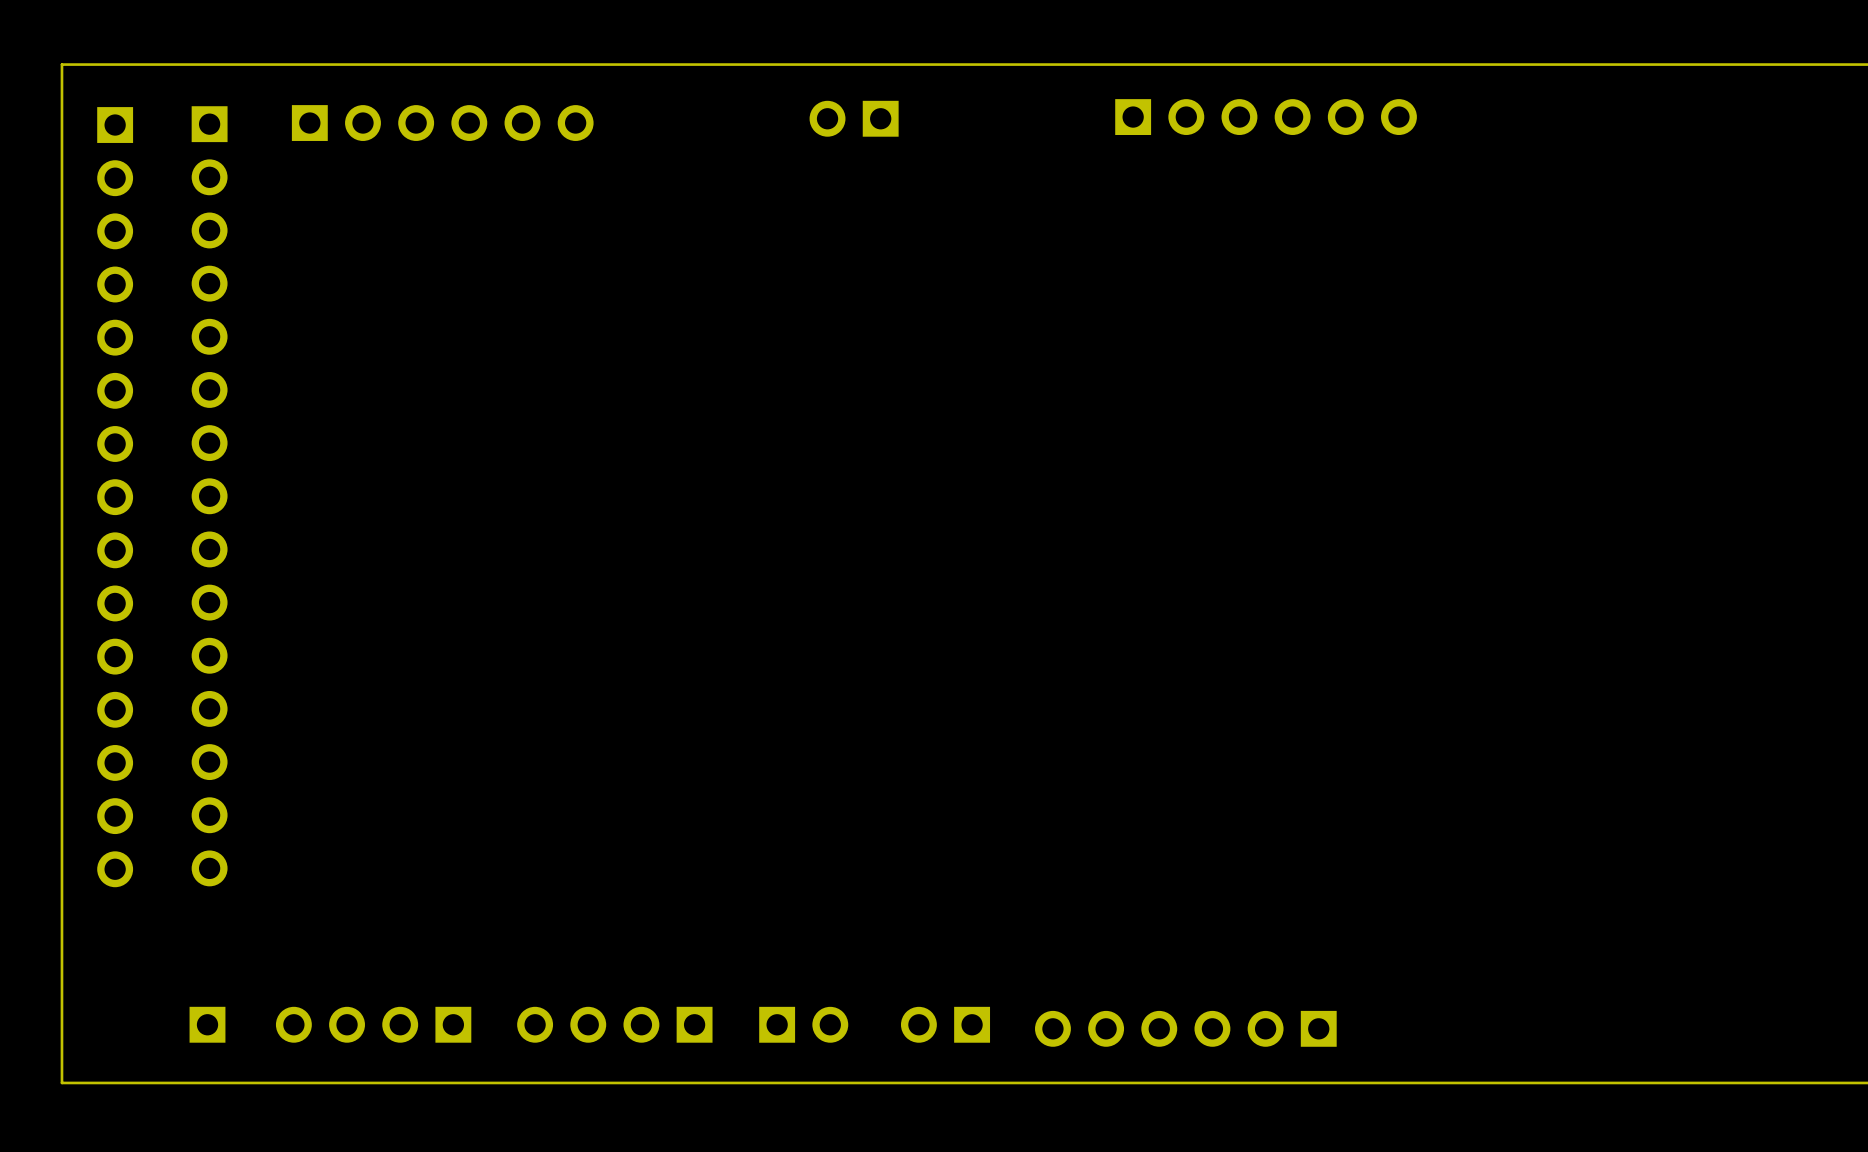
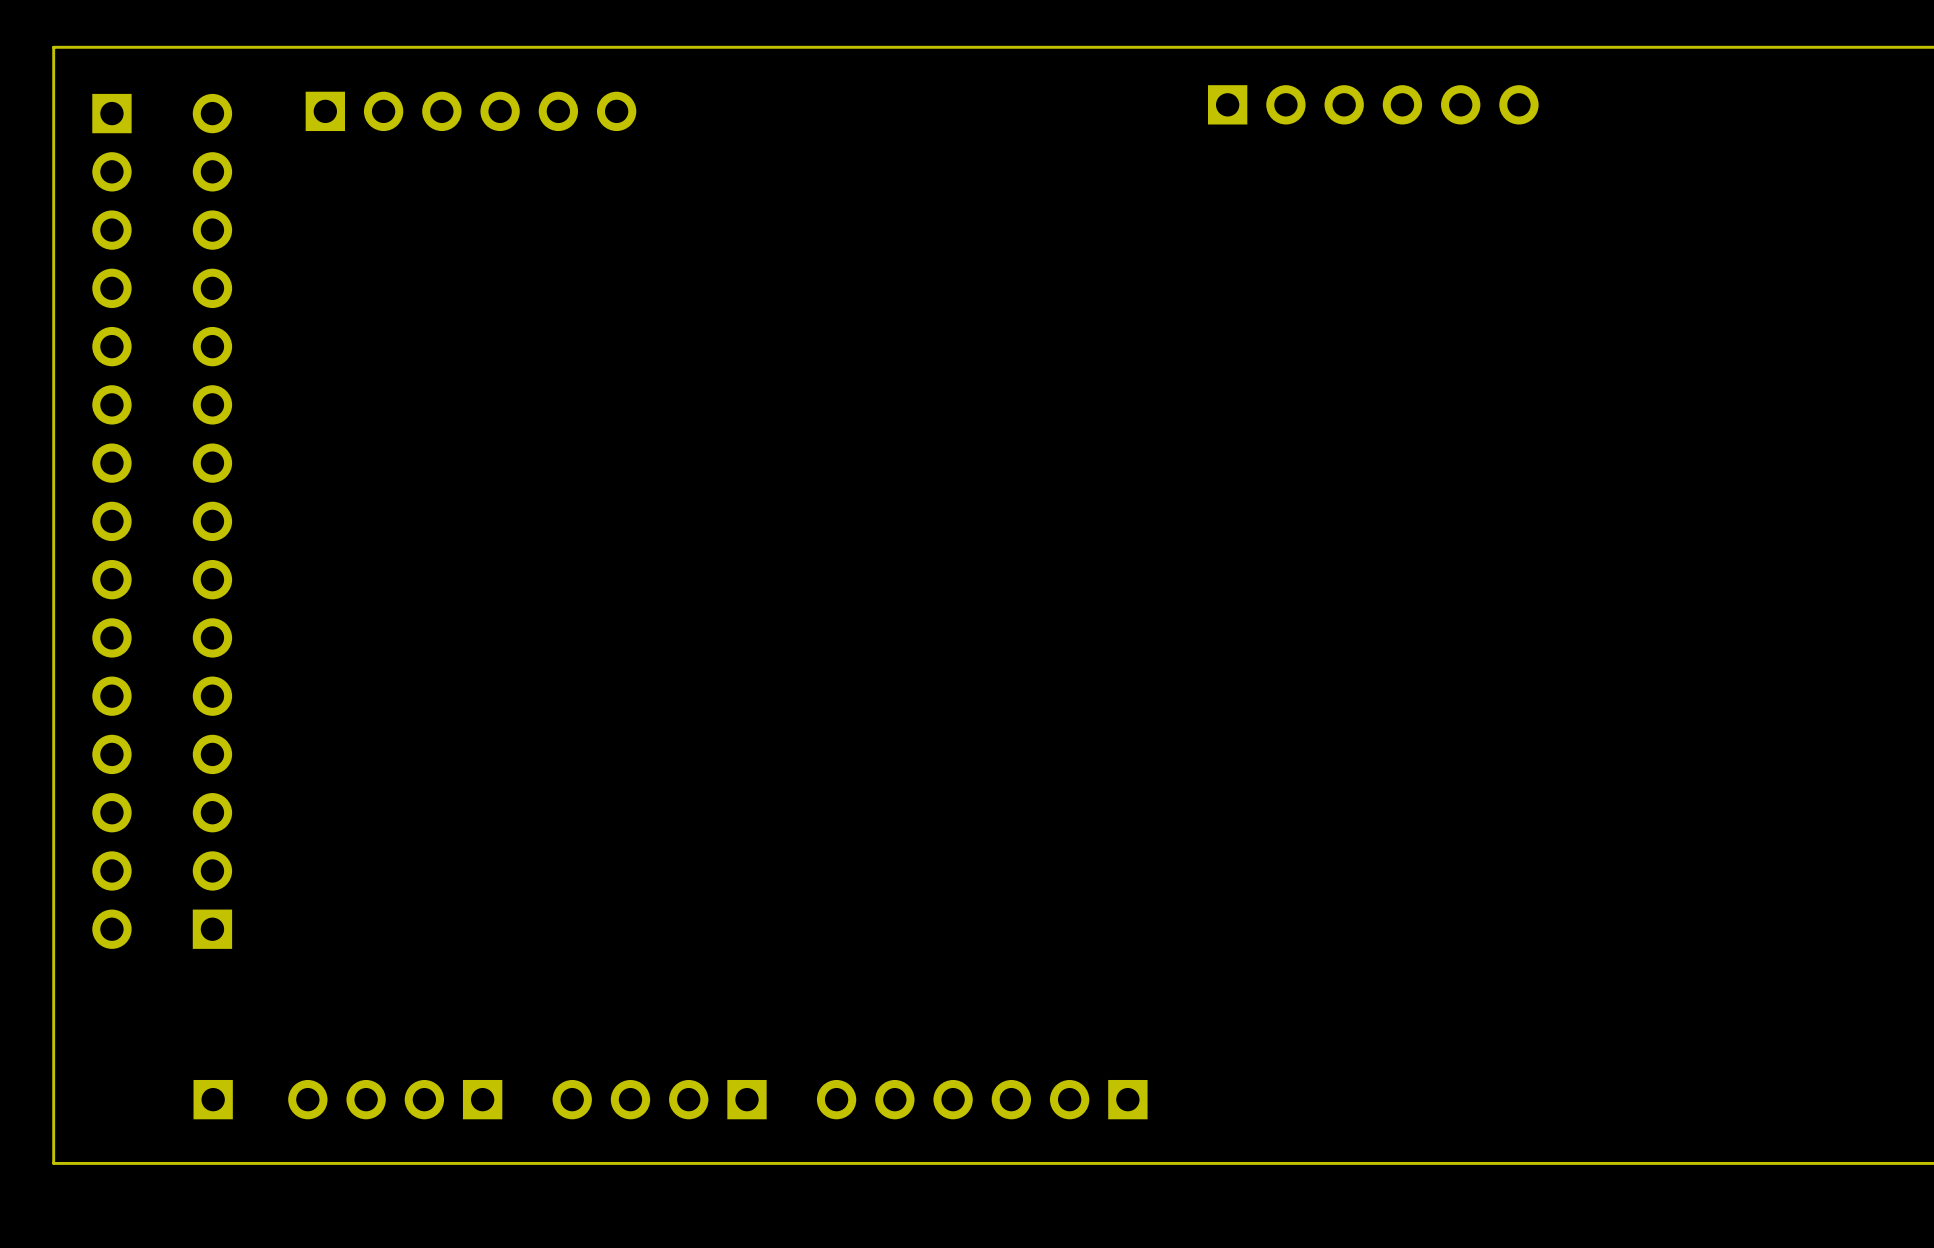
part: (854, 118) -> none
part rotation: 0° (209, 496) -> 180° (212, 521)
part: (803, 1024) -> none
part: (945, 1024) -> none
part position: (1185, 1028) -> (982, 1099)

